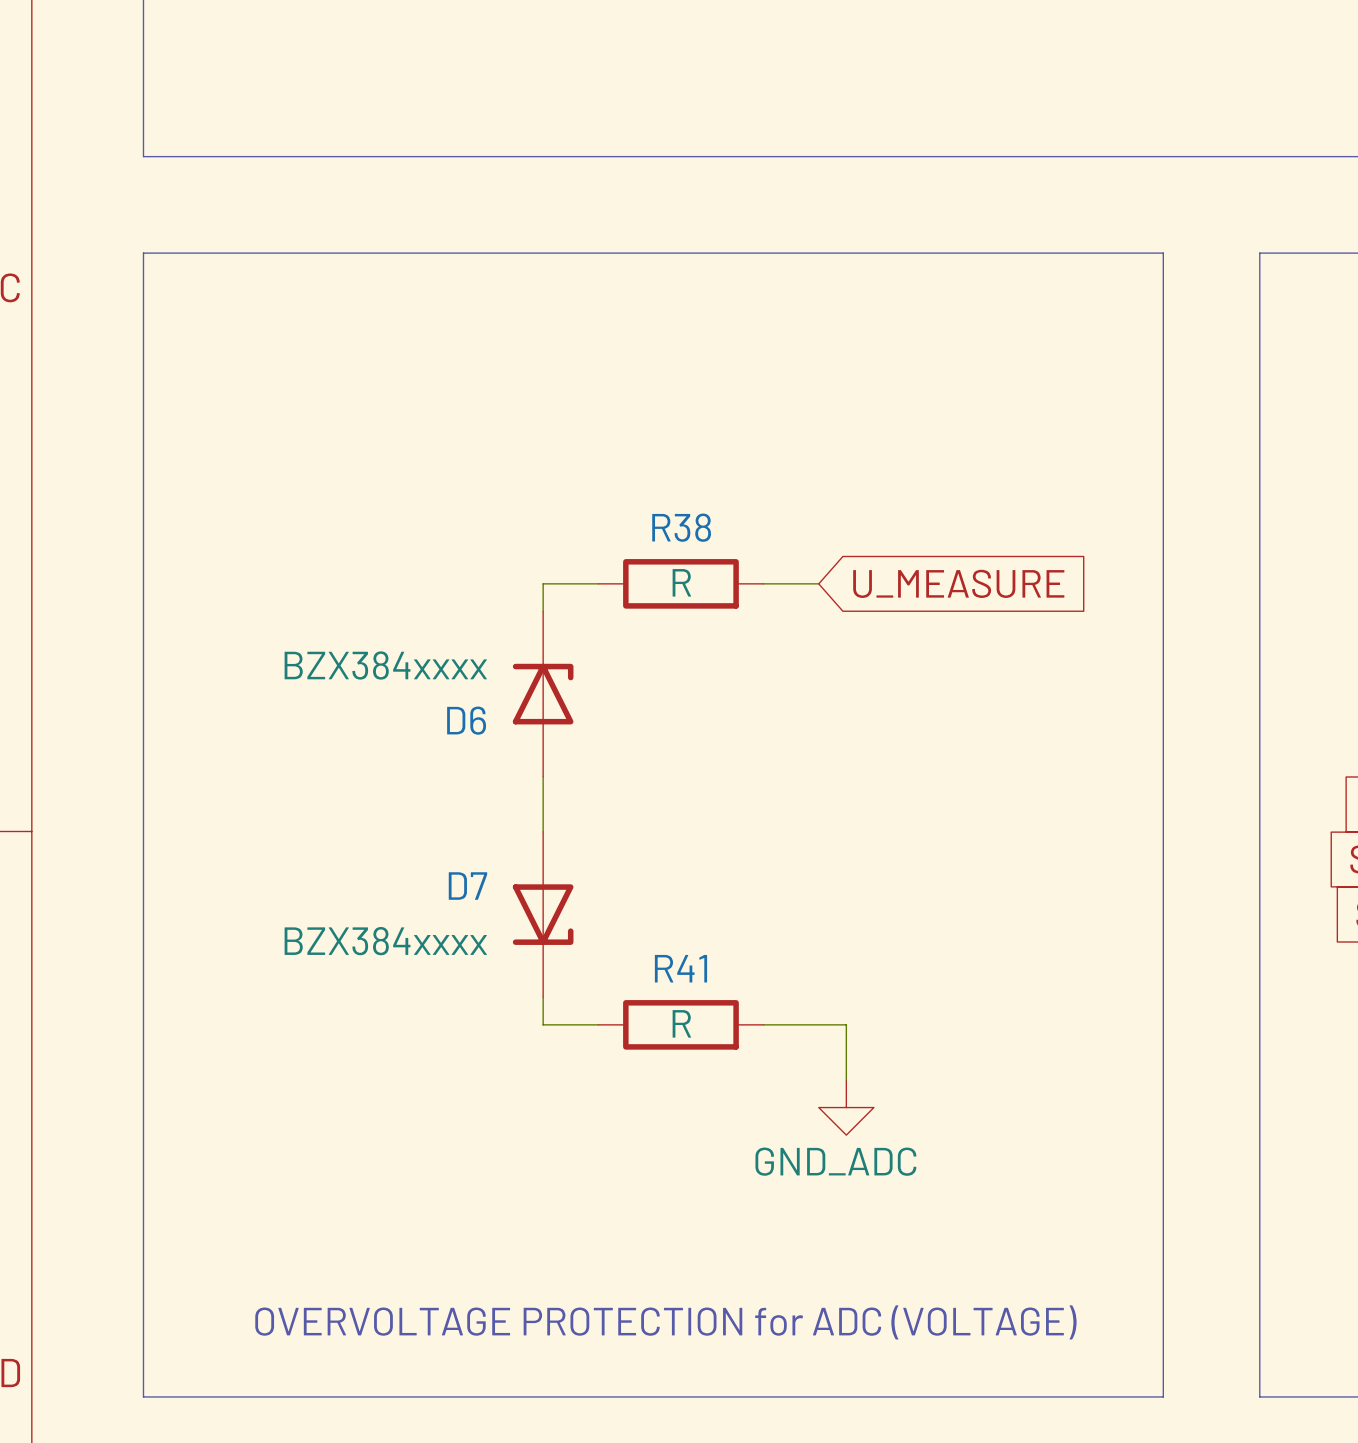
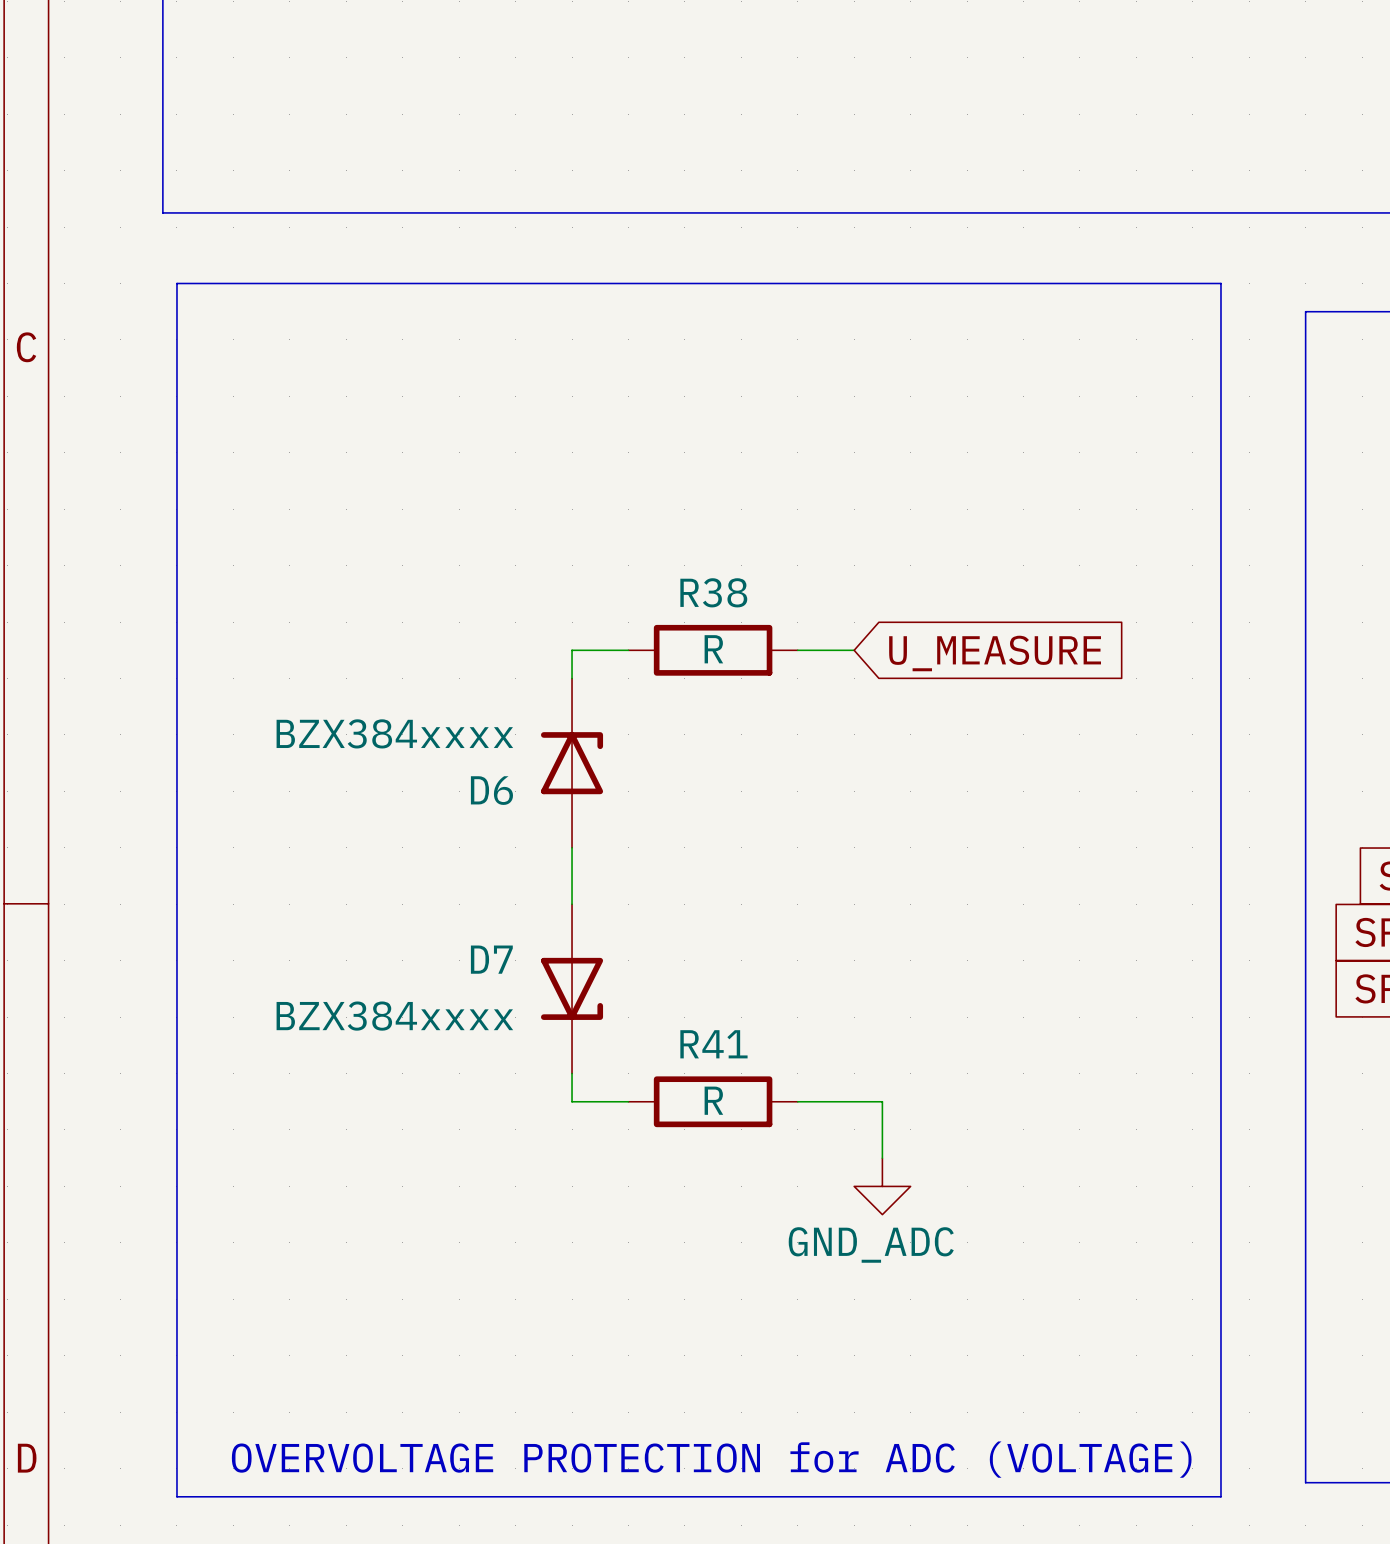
line: (143, 253) (1163, 253) (1163, 1396) (143, 1396) (143, 253) -> (176, 283) (176, 1496) (1220, 1496) (1220, 283) (176, 283)
text position: OVERVOLTAGE PROTECTION for ADC (VOLTAGE) (665, 1322) -> OVERVOLTAGE PROTECTION for ADC (VOLTAGE) (711, 1459)

